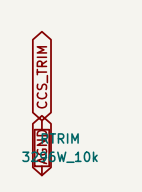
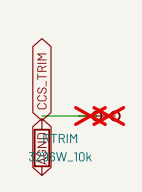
wire: none -> (41, 116) (96, 116)
part: none -> (90, 116)
part: none -> (108, 116)

